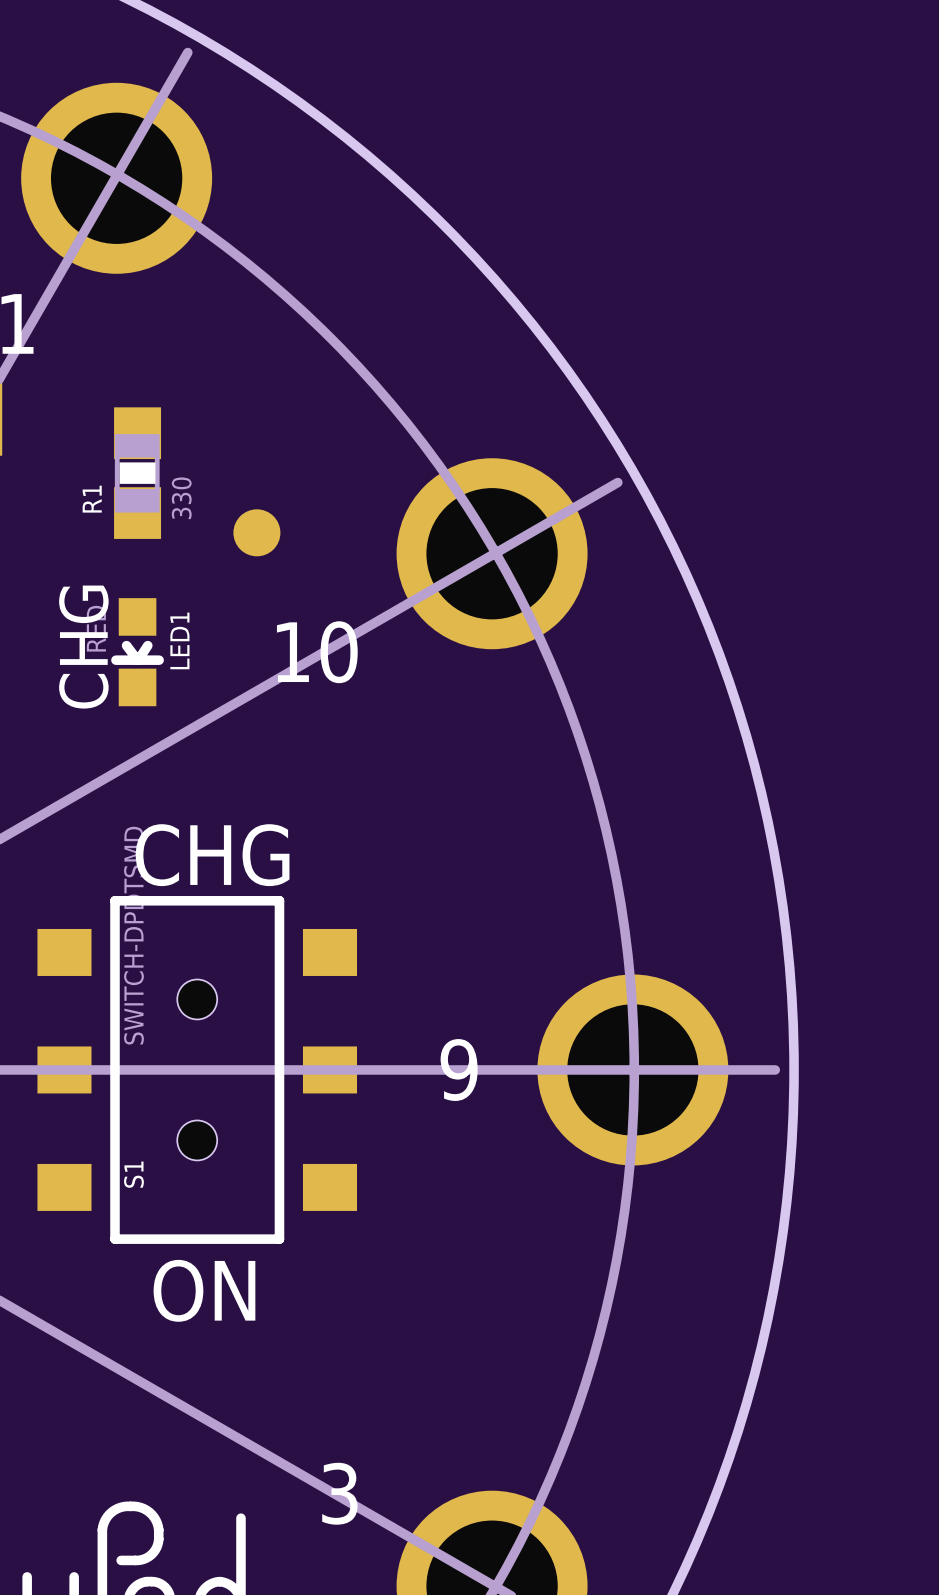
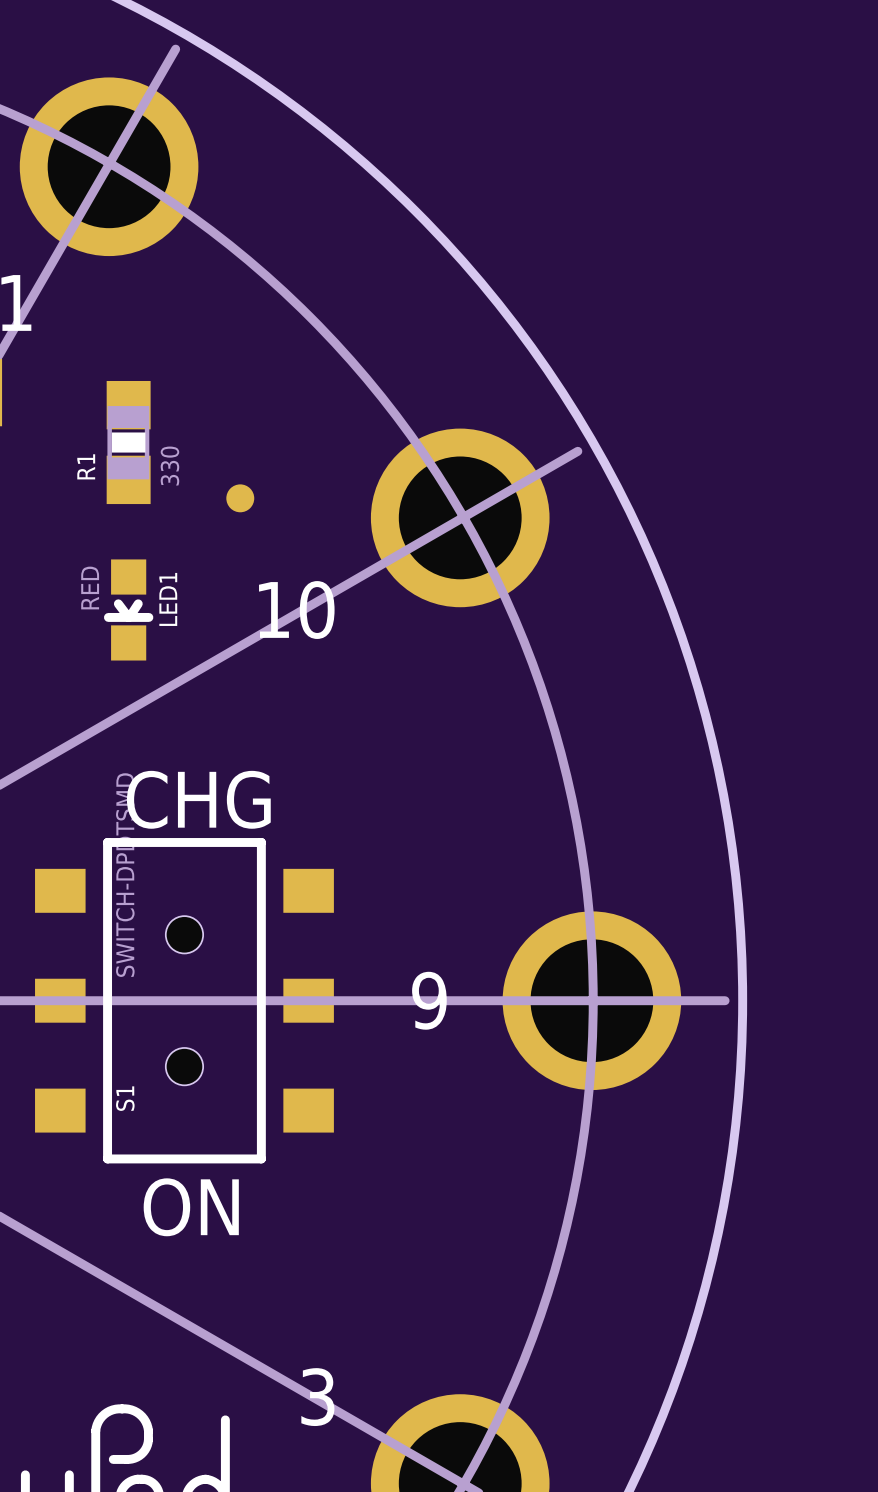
part footprint: [233, 509, 281, 557] -> [226, 484, 255, 513]
text: CHG (83, 647) -> none

